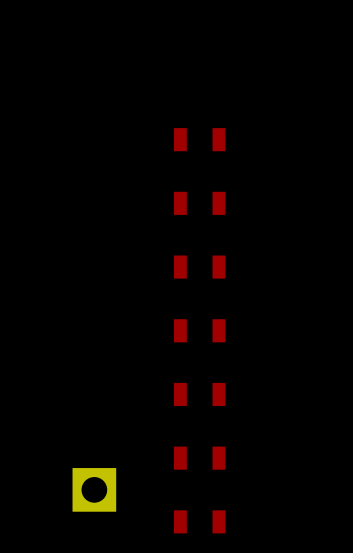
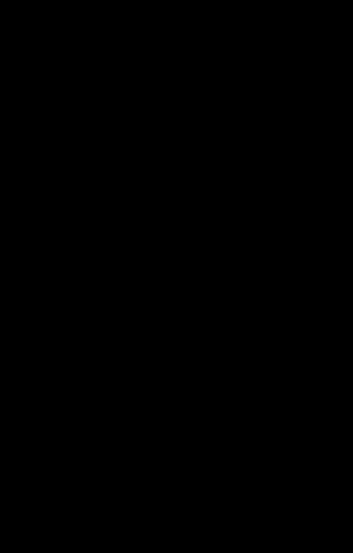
part: (199, 139) -> none
part: (199, 203) -> none
part: (199, 267) -> none
part: (199, 330) -> none
part: (199, 394) -> none
part: (199, 458) -> none
part: (94, 489) -> none
part: (199, 521) -> none

